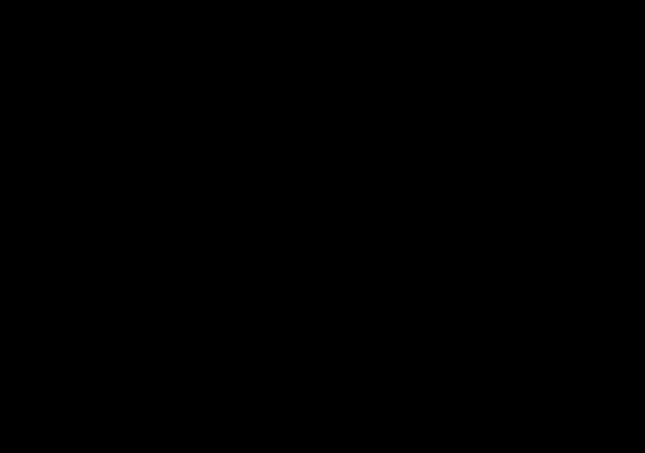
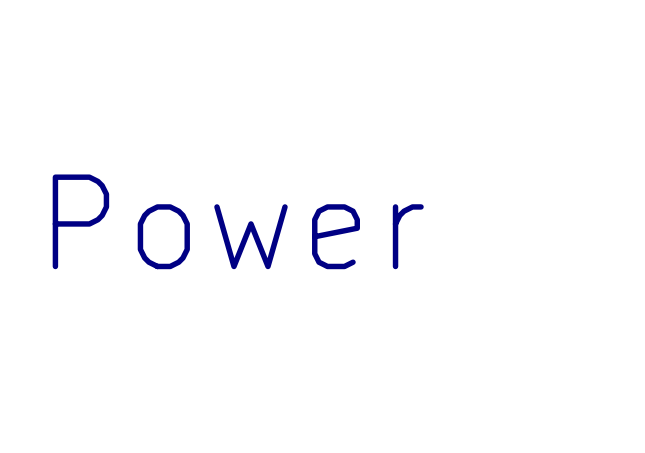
text: none -> Power (238, 221)

